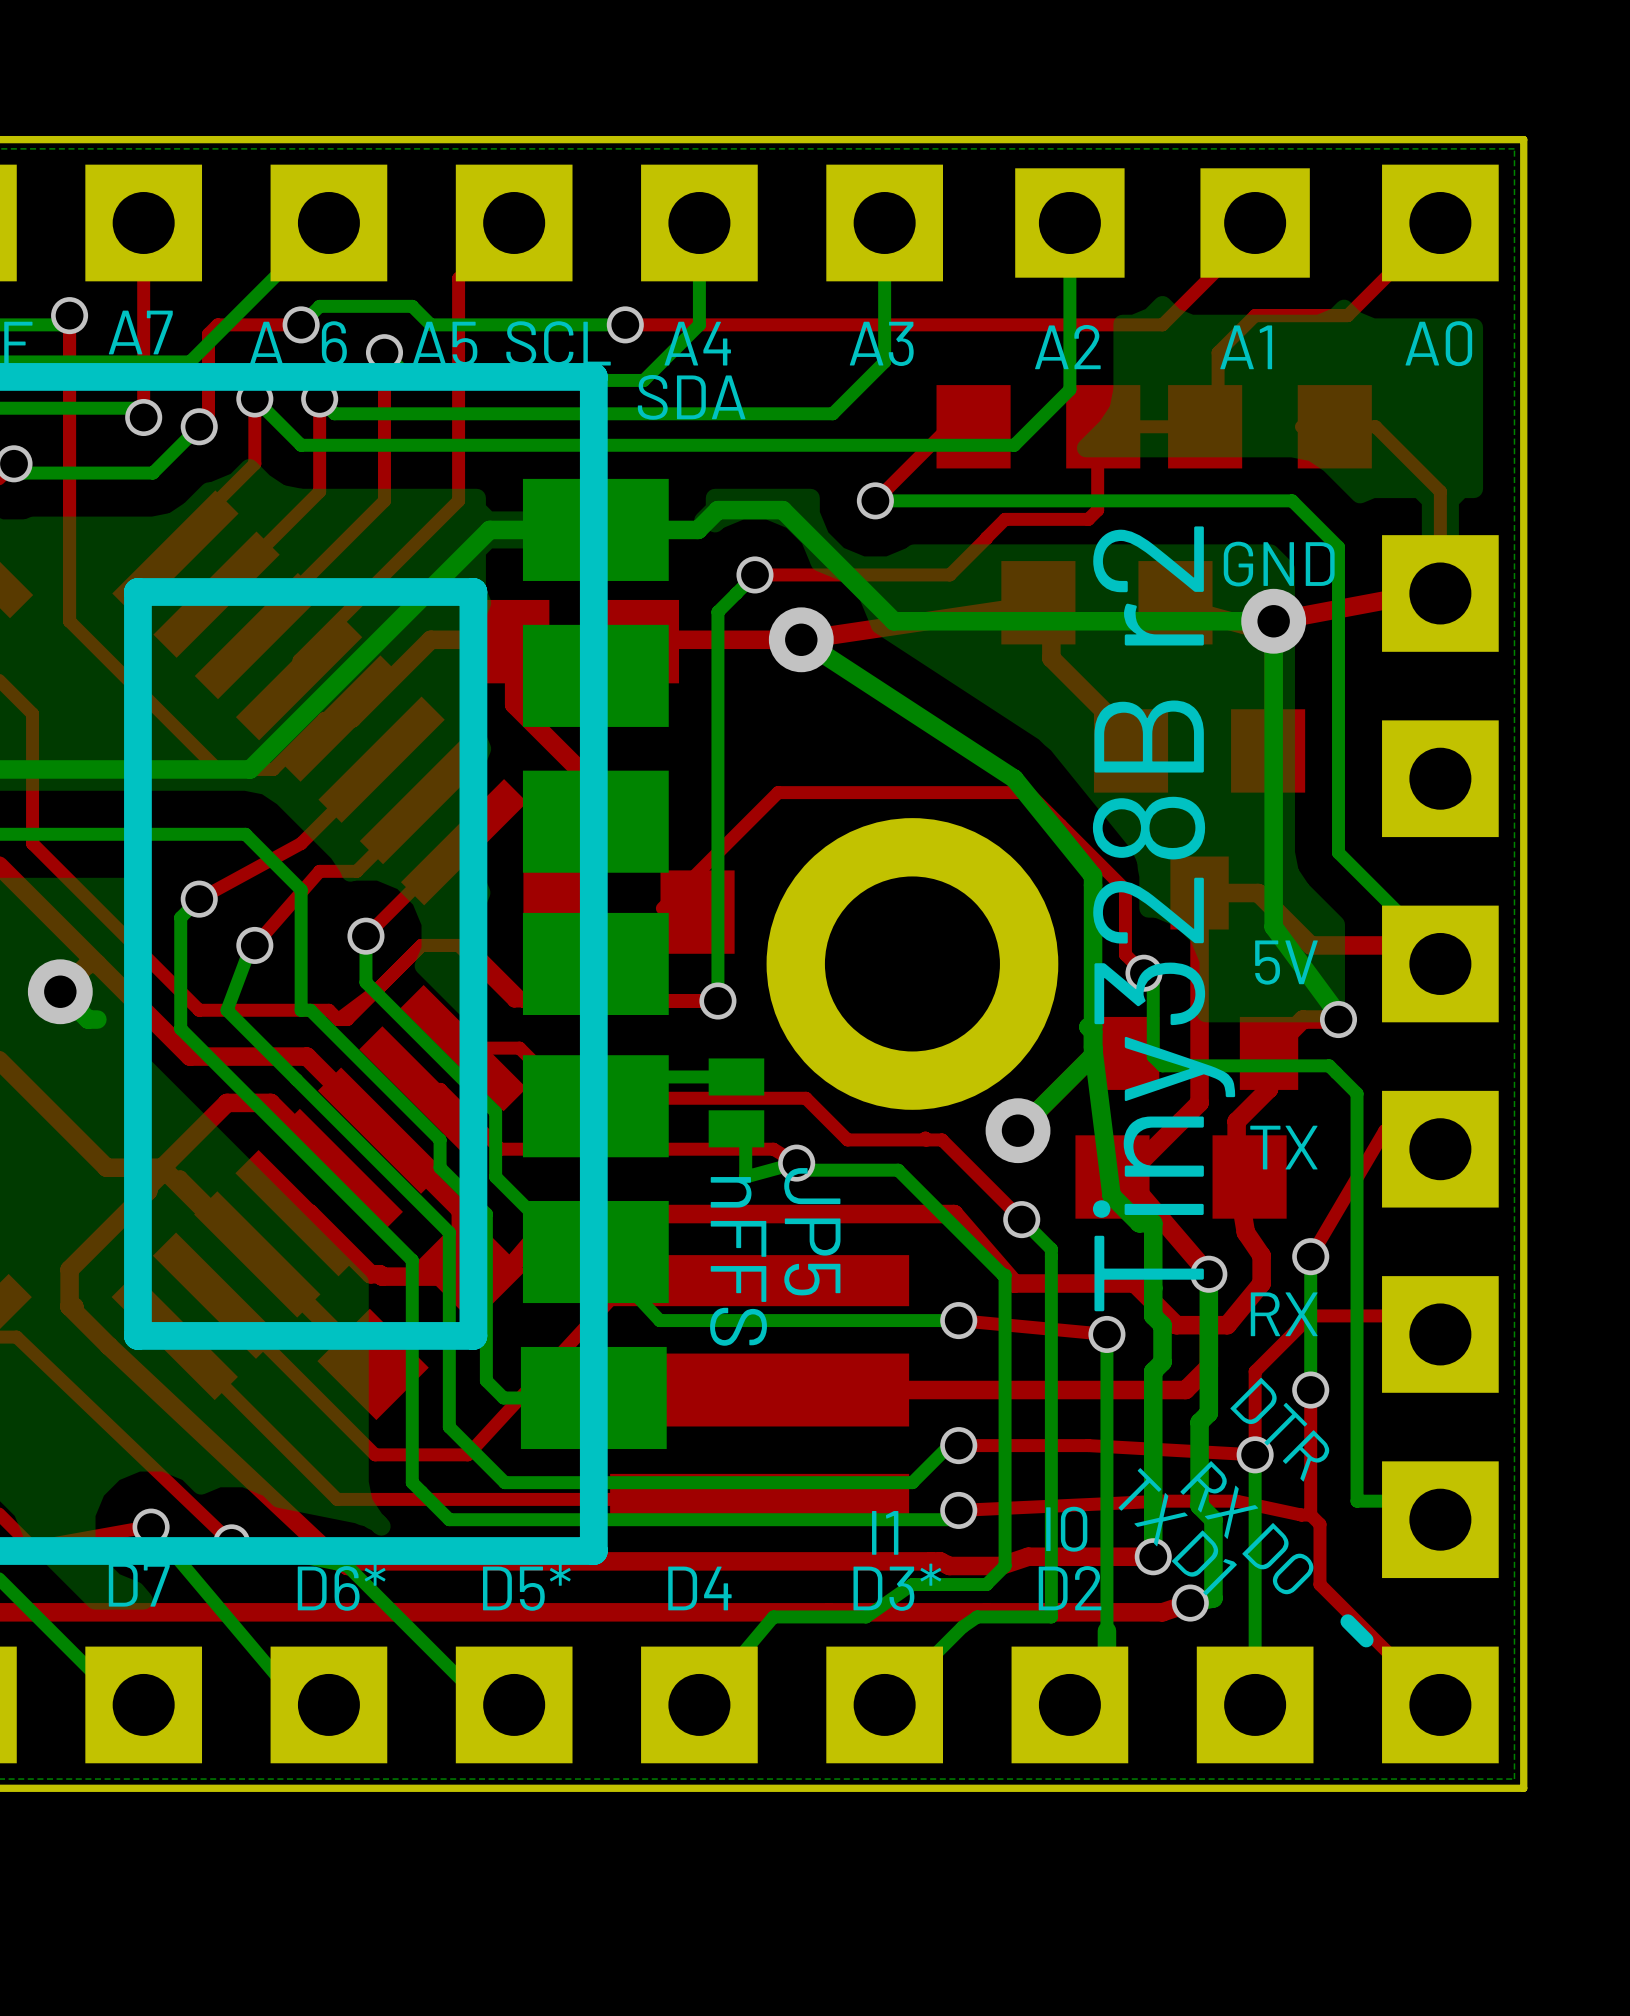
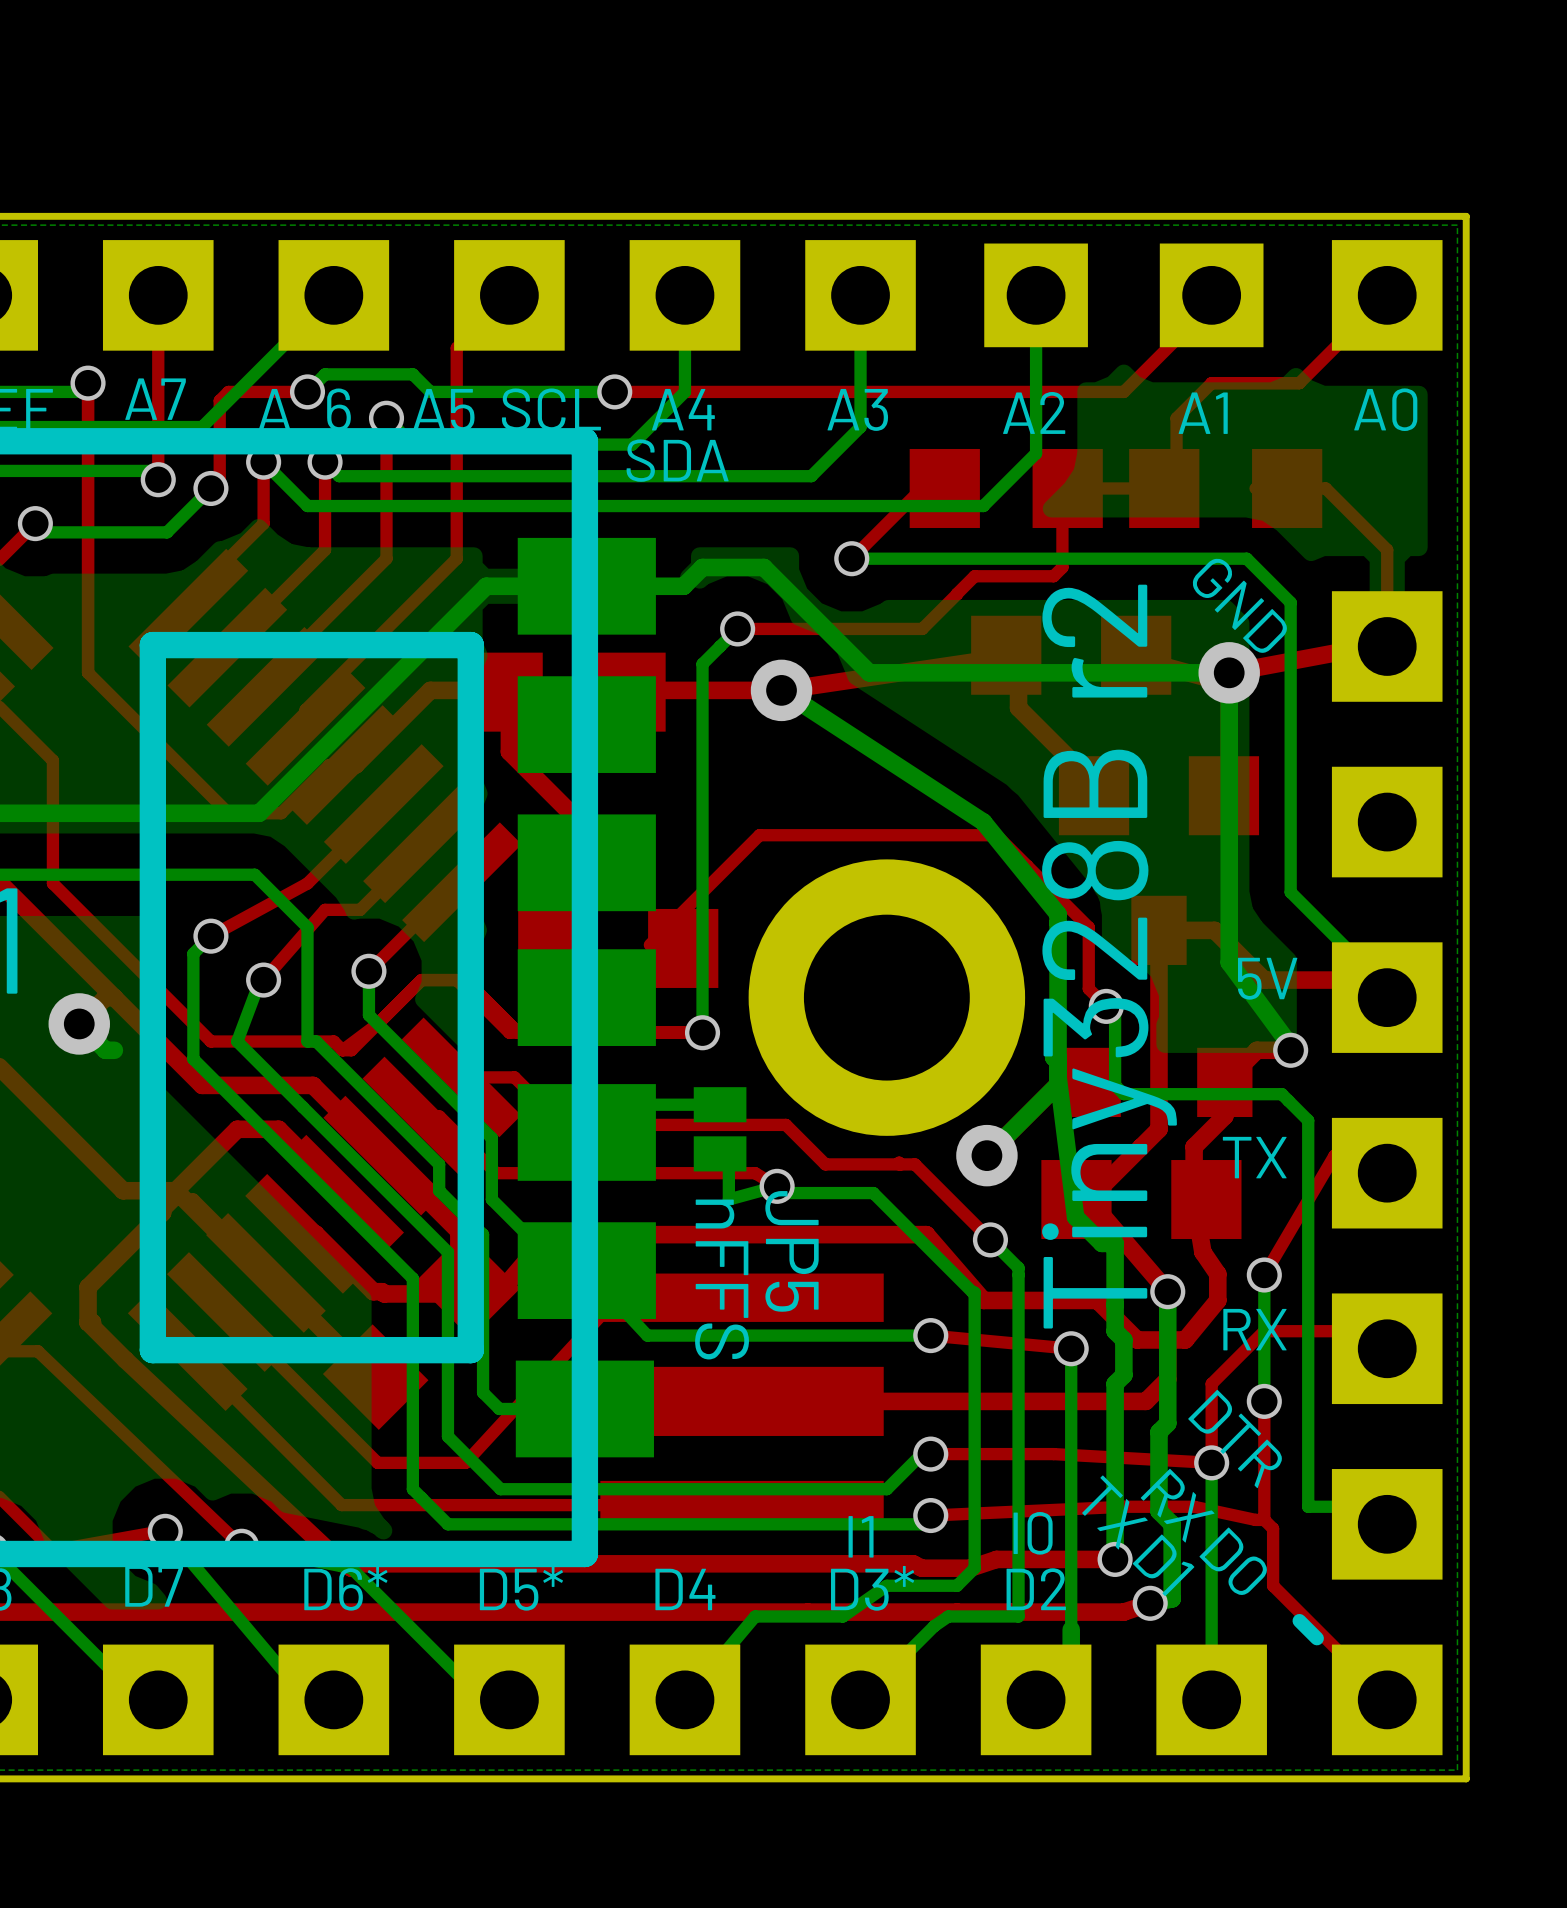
text rotation: 0° (1279, 564) -> 45° clockwise (1239, 605)
text position: Tiny328B r2 (1164, 918) -> Tiny328B r2 (1109, 956)
text position: 5V (1286, 962) -> 5V (1267, 978)
text position: TX (1283, 1147) -> TX (1254, 1157)
text position: RX (1284, 1314) -> RX (1254, 1329)

